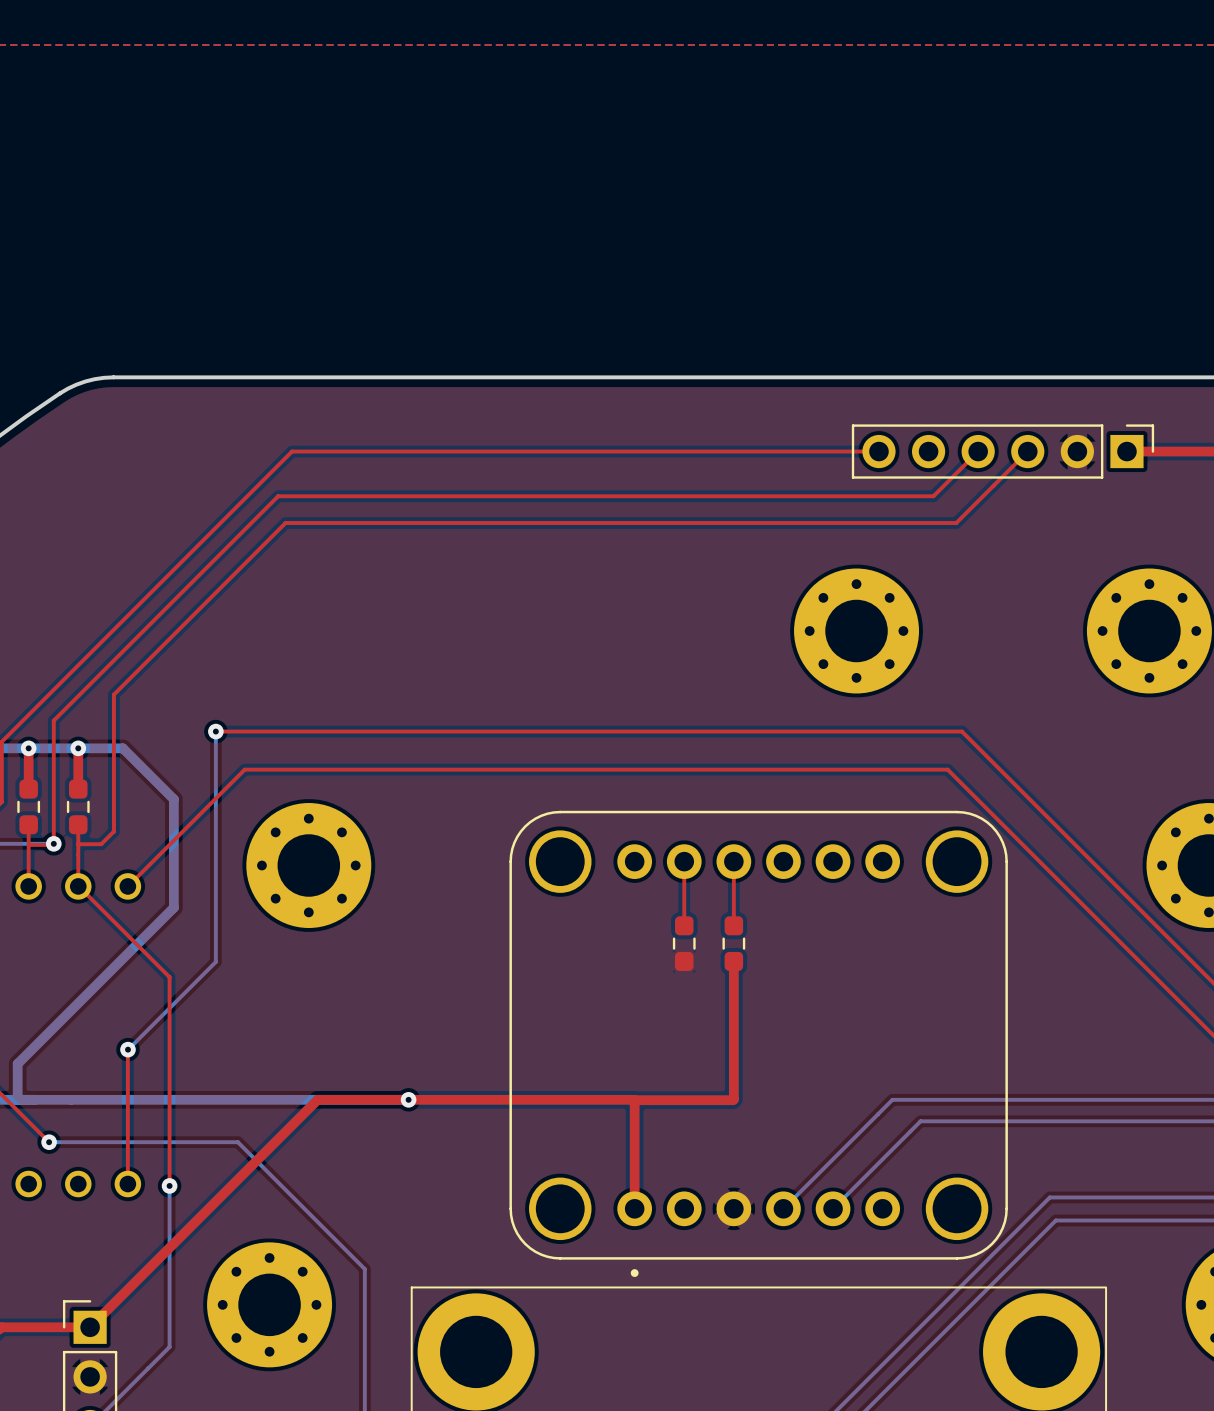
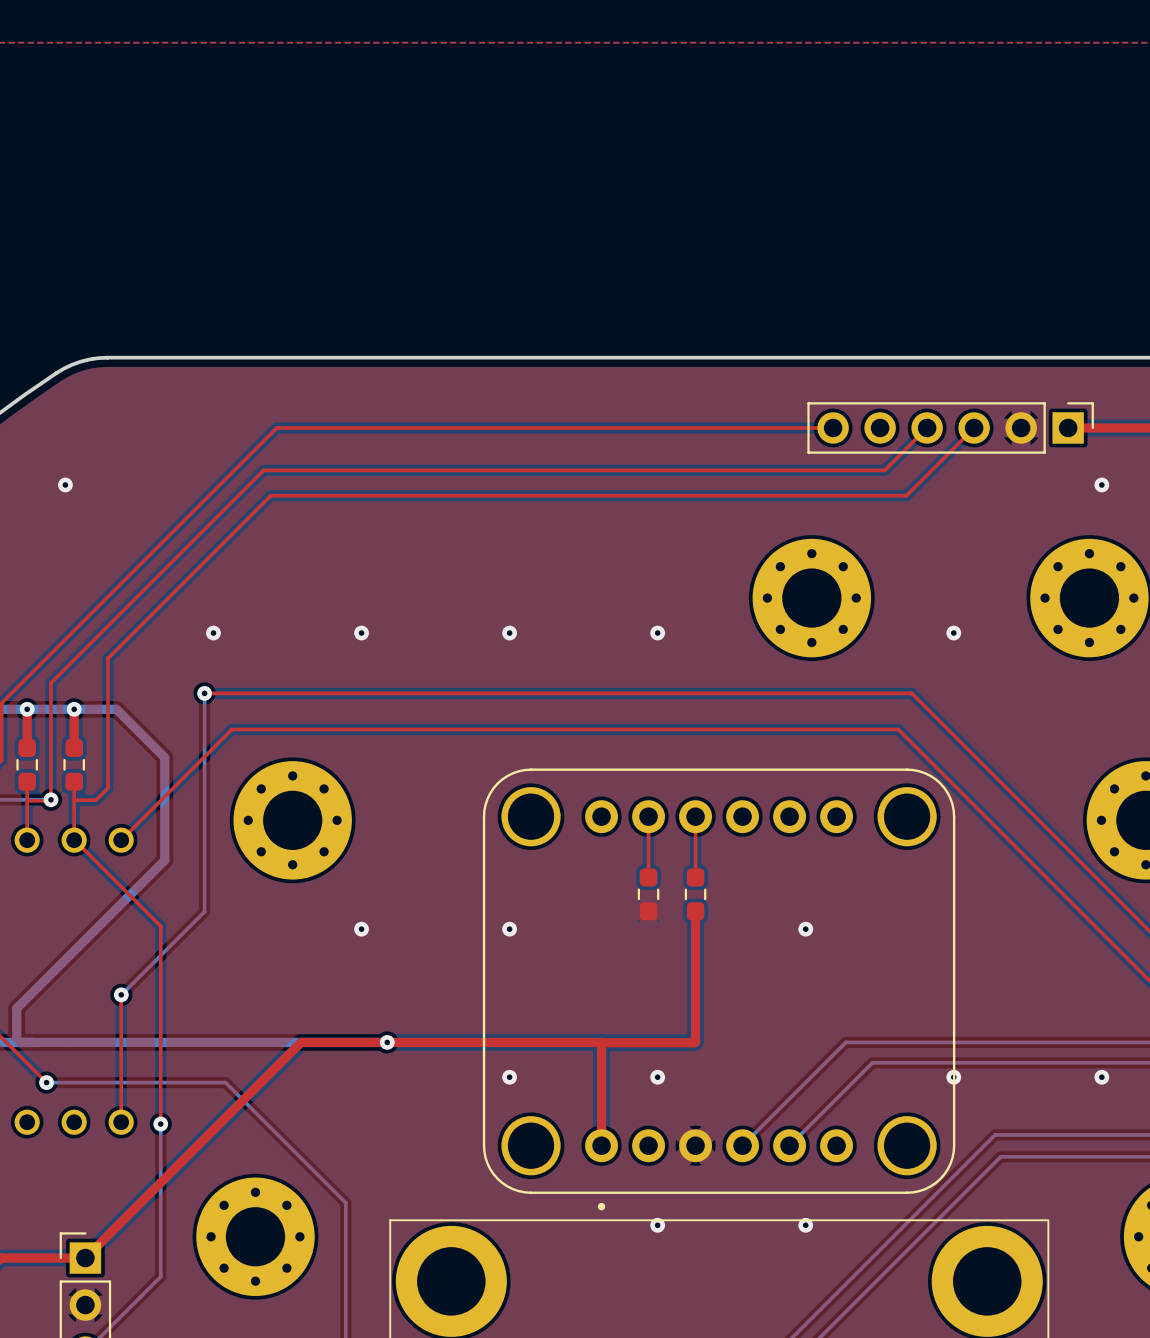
via: none -> (65, 484)
via: none -> (1101, 484)
via: none -> (213, 633)
via: none -> (361, 633)
via: none -> (509, 633)
via: none -> (657, 633)
via: none -> (953, 633)
via: none -> (361, 929)
via: none -> (509, 929)
via: none -> (805, 929)
via: none -> (509, 1077)
via: none -> (657, 1077)
via: none -> (953, 1077)
via: none -> (1101, 1077)
via: none -> (657, 1225)
via: none -> (805, 1225)

